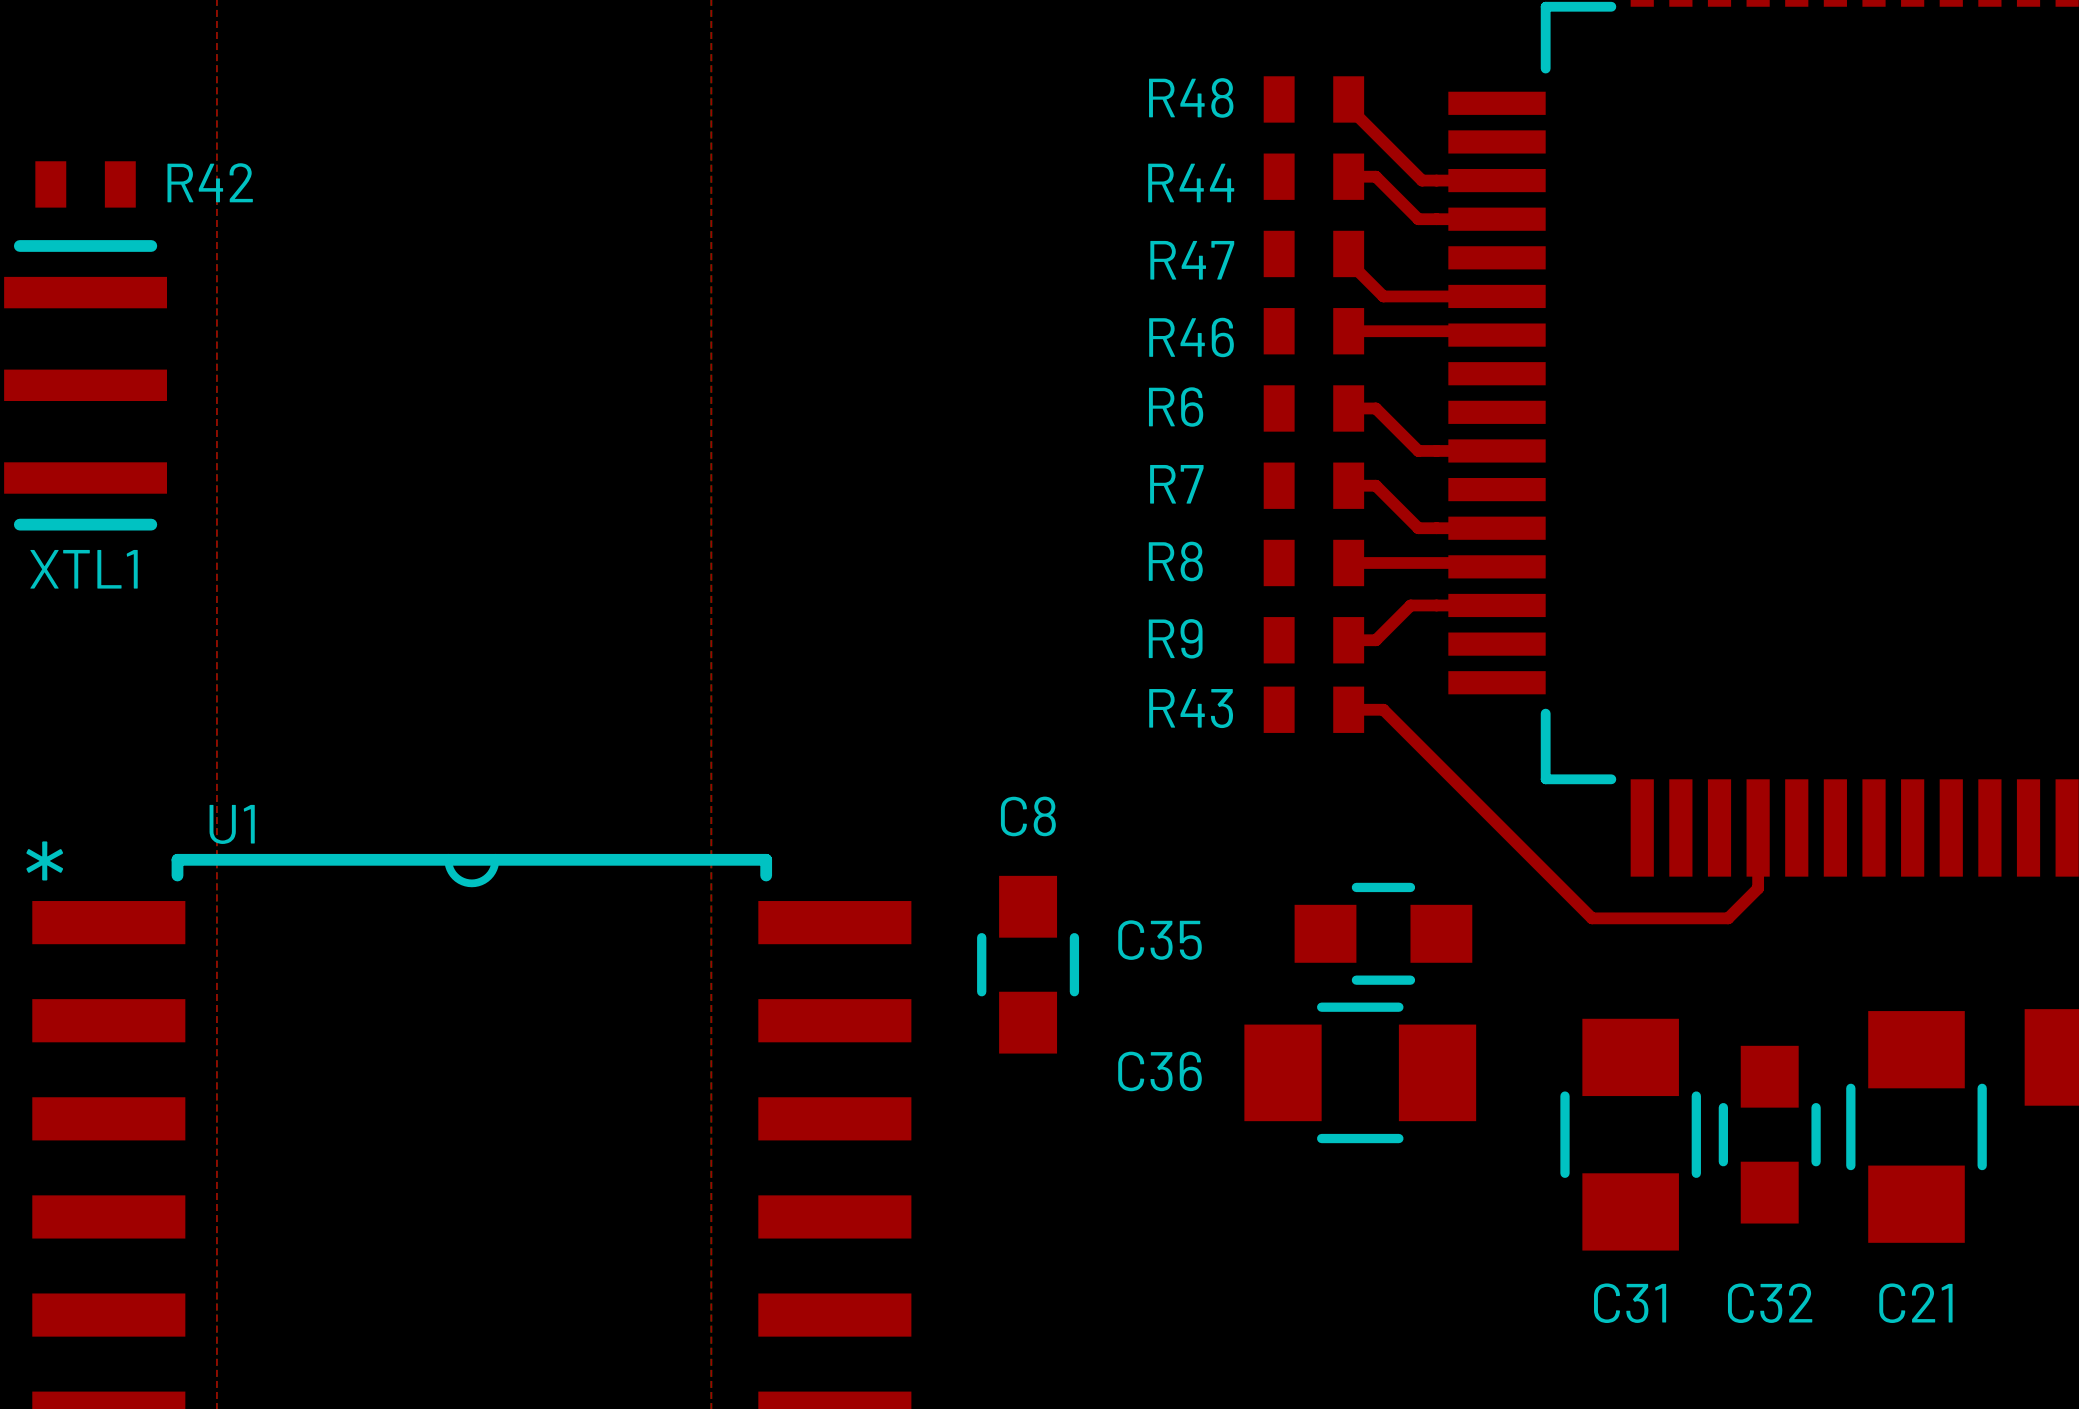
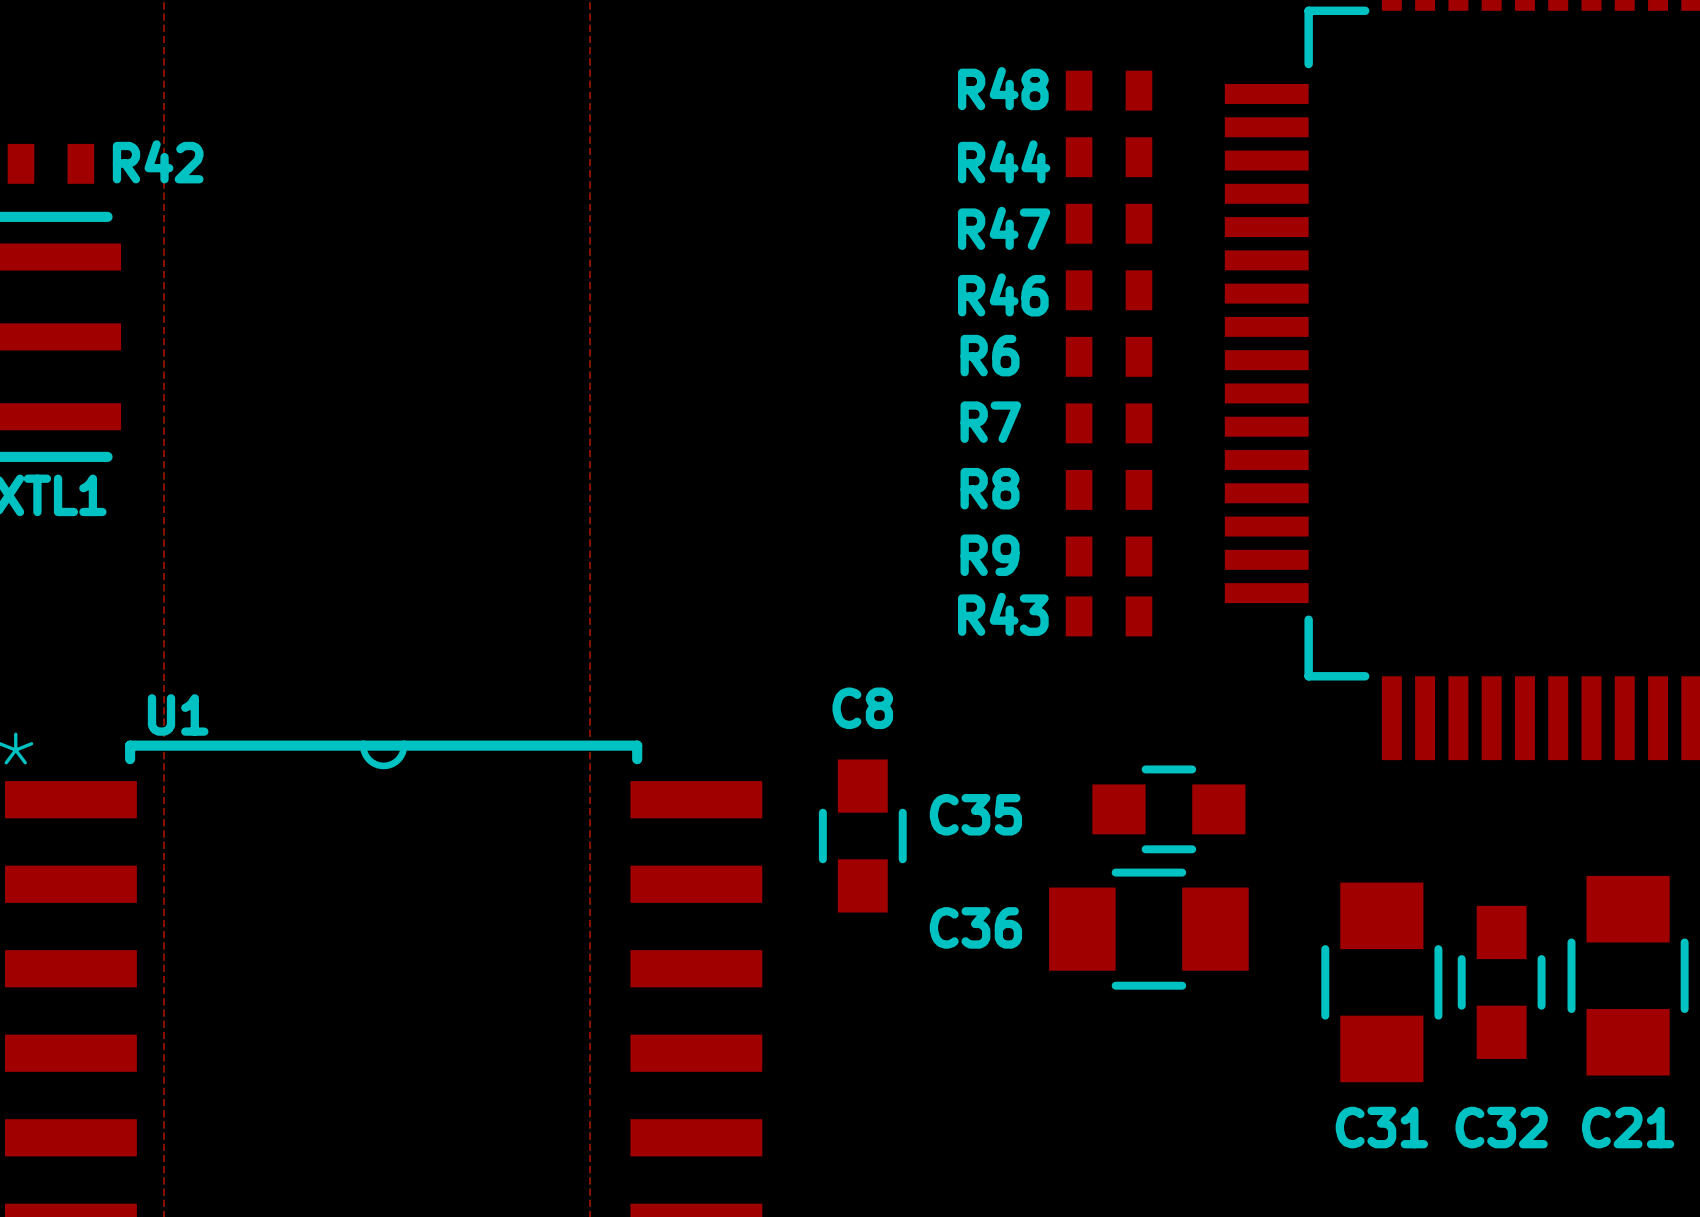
top track: (1348, 99) (1348, 107) (1422, 180) (1497, 180) -> none
top track: (1348, 176) (1375, 176) (1418, 219) (1497, 219) -> none
top track: (1348, 253) (1348, 261) (1383, 296) (1497, 296) -> none
top track: (1348, 331) (1462, 331) -> none
top track: (1348, 408) (1375, 408) (1418, 450) (1497, 450) -> none
top track: (1348, 485) (1375, 485) (1418, 528) (1497, 528) -> none
top track: (1348, 562) (1493, 562) (1497, 566) -> none
top track: (1497, 605) (1410, 605) (1375, 640) (1348, 640) -> none
top track: (1348, 709) (1383, 709) (1592, 918) (1728, 918) (1758, 888) (1758, 827) -> none

